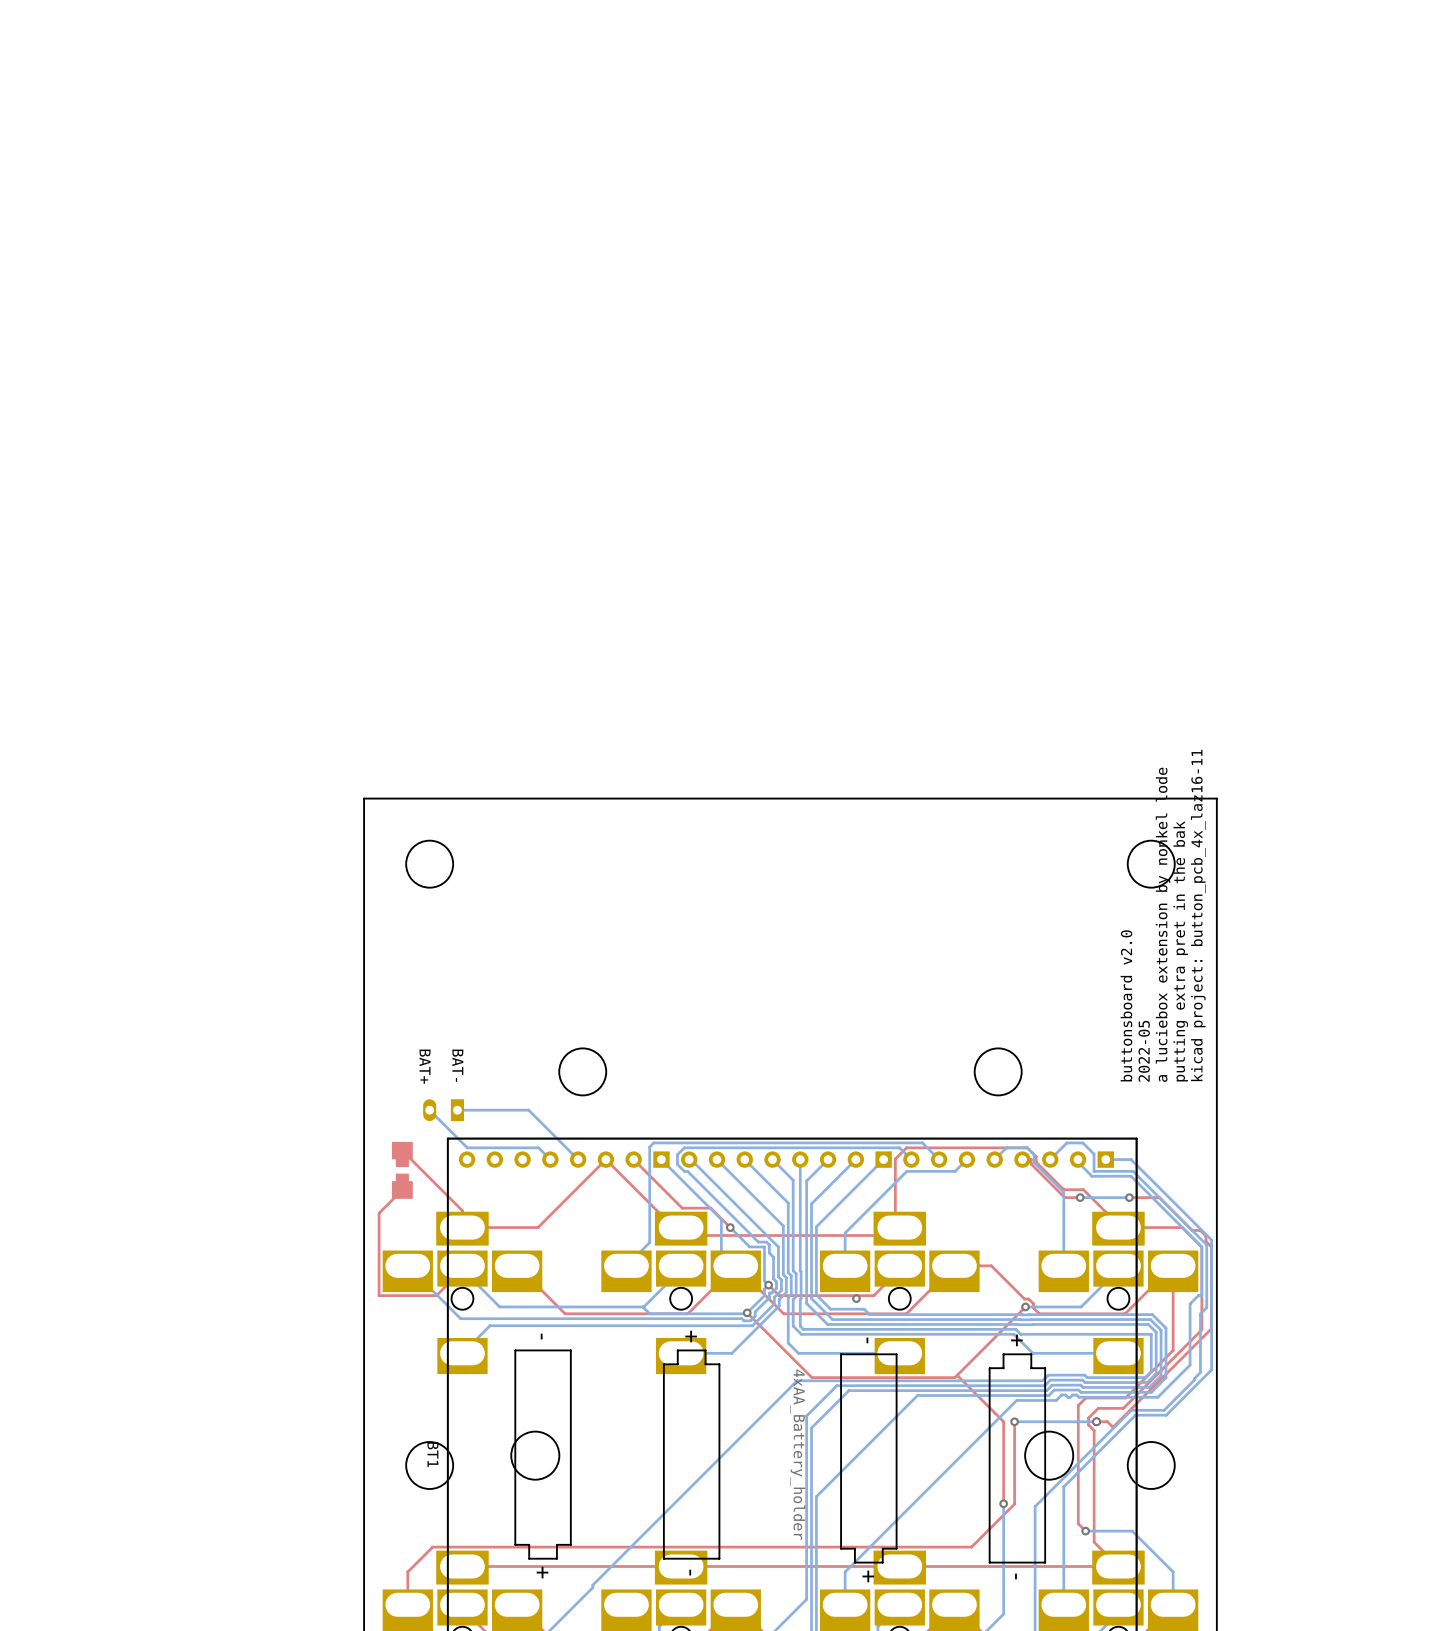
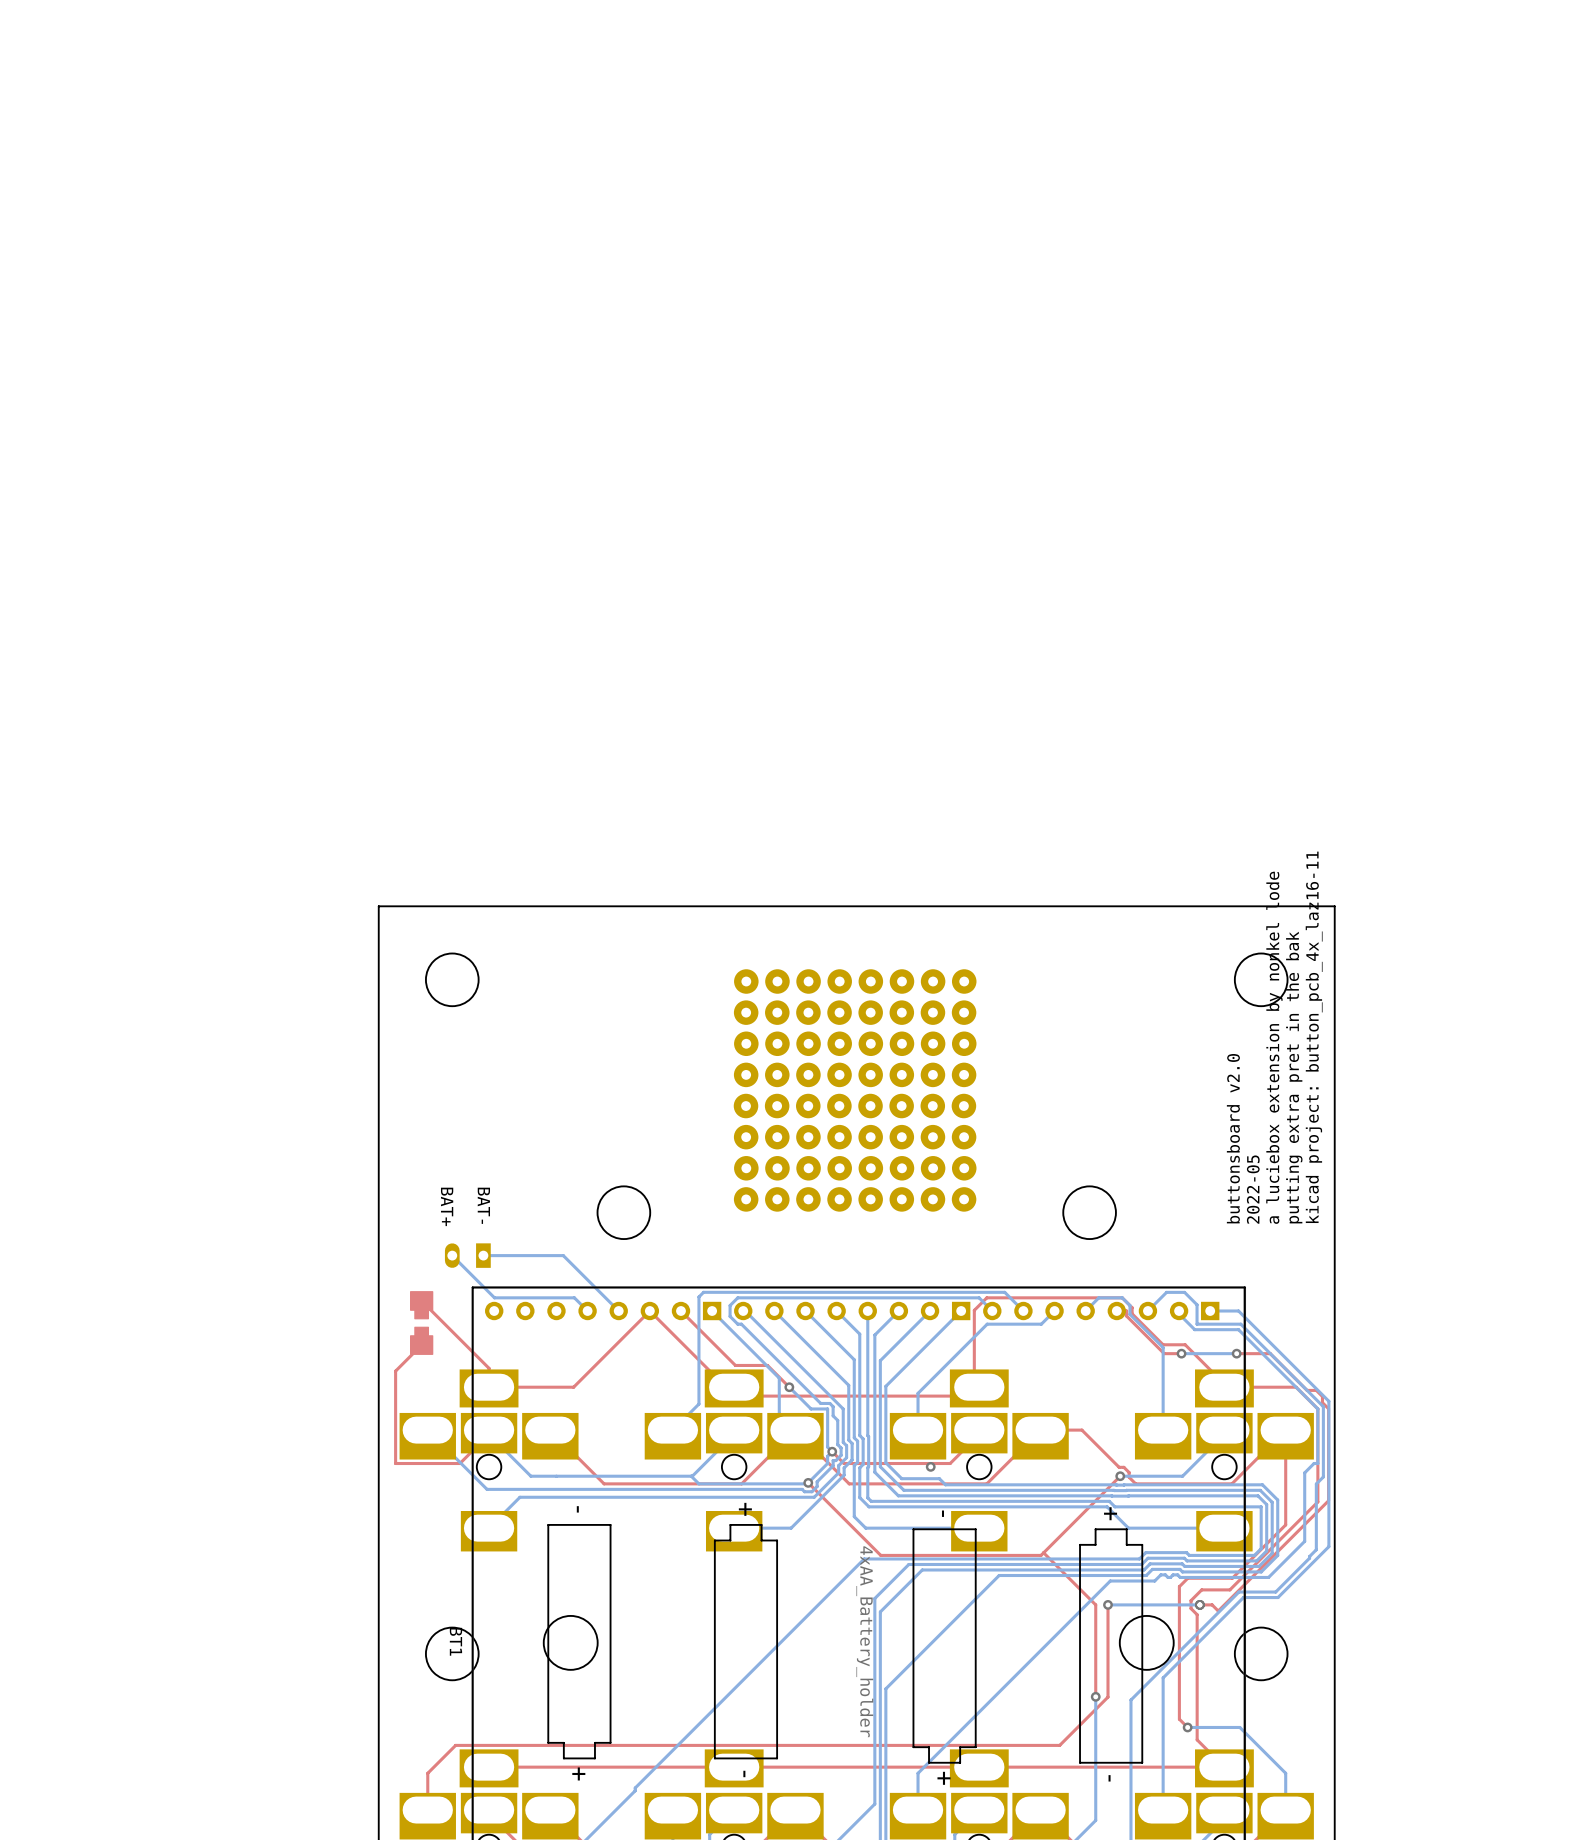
part: none -> (855, 1090)

